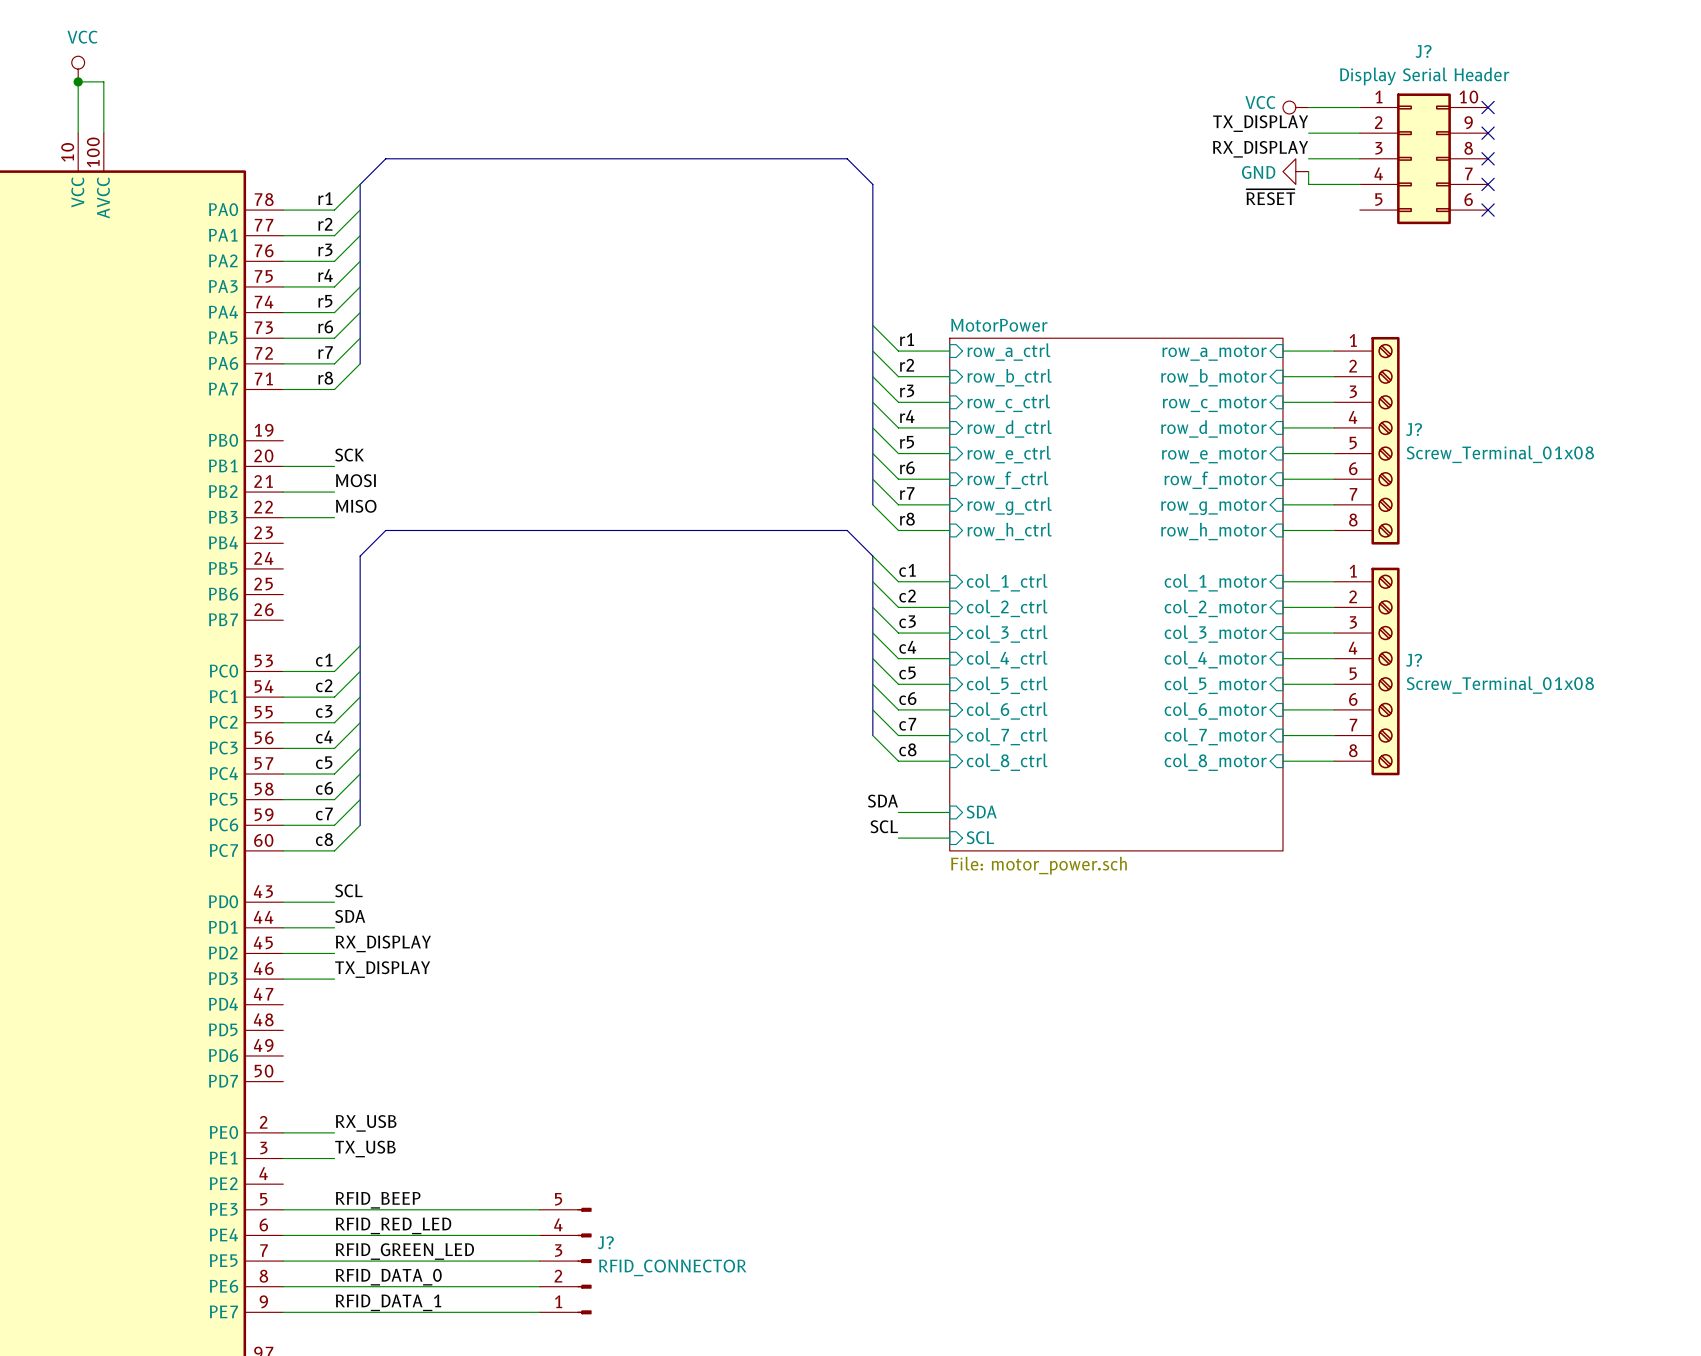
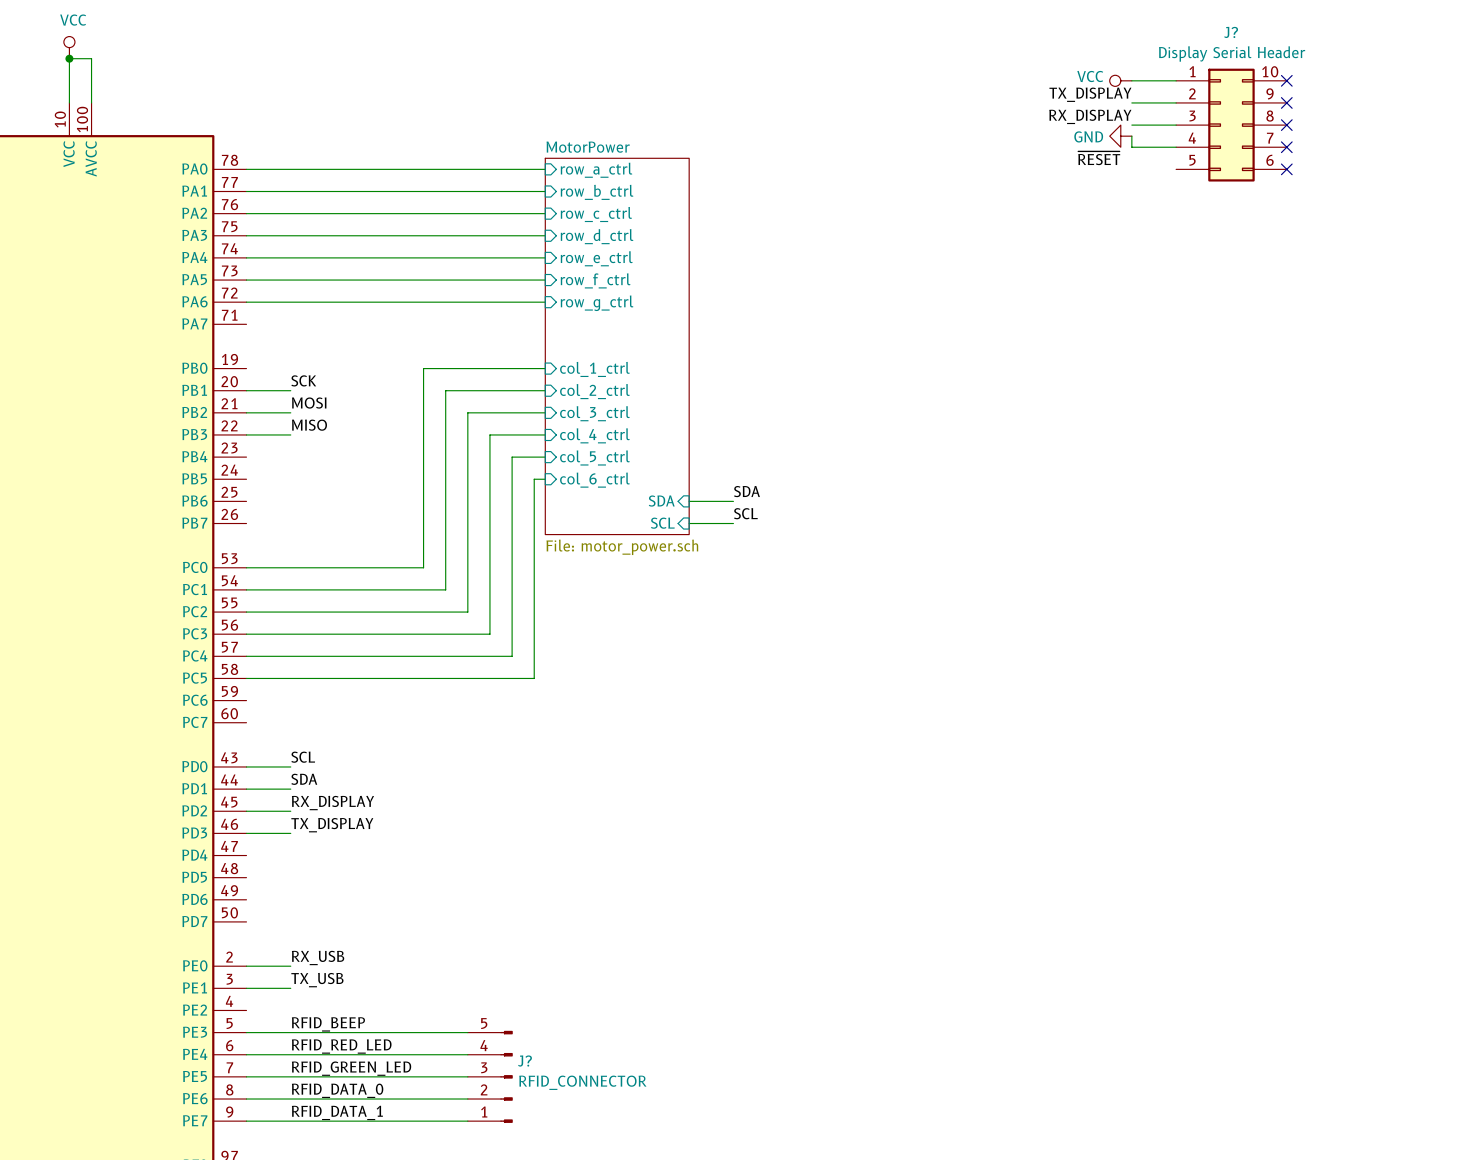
wire: (360, 184) (334, 210) -> (545, 169) (290, 169)
label: r1 (325, 198) -> none
wire: (360, 210) (334, 235) -> (545, 191) (290, 191)
sheet pin: none -> row_a_ctrl (596, 170)
label: r2 (325, 224) -> none
wire: (360, 235) (334, 261) -> (545, 213) (290, 213)
sheet pin: none -> row_b_ctrl (597, 192)
label: r3 (325, 249) -> none
wire: (360, 261) (334, 286) -> (545, 235) (290, 235)
sheet pin: none -> row_c_ctrl (596, 214)
label: r4 (325, 275) -> none
wire: (360, 286) (334, 312) -> (545, 257) (290, 257)
sheet pin: none -> row_d_ctrl (597, 236)
label: r5 (325, 301) -> none
wire: (360, 312) (334, 338) -> (545, 280) (290, 280)
sheet pin: none -> row_e_ctrl (596, 258)
wire: (872, 325) (898, 351) (949, 351) -> none
label: r6 (325, 326) -> none
wire: (360, 338) (334, 363) -> (545, 302) (290, 302)
sheet pin: none -> row_f_ctrl (595, 280)
label: r1 (907, 339) -> none
wire: (872, 351) (898, 376) (949, 376) -> none
wire: (1282, 351) (1334, 351) -> none
label: r7 (325, 352) -> none
sheet pin: row_a_ctrl (1009, 352) -> none
sheet pin: row_a_motor (1214, 352) -> none
wire: (360, 363) (334, 389) (283, 389) -> none
bus: (360, 363) (360, 184) (385, 158) (847, 158) (872, 184) (872, 504) -> none
sheet pin: none -> row_g_ctrl (597, 303)
label: r2 (907, 365) -> none
wire: (872, 376) (898, 402) (949, 402) -> none
wire: (1282, 376) (1334, 376) -> none
sheet pin: row_b_ctrl (1009, 377) -> none
sheet pin: row_b_motor (1214, 377) -> none
label: r8 (325, 378) -> none
label: r3 (907, 390) -> none
wire: (872, 402) (898, 427) (949, 427) -> none
wire: (1282, 402) (1334, 402) -> none
sheet pin: row_c_ctrl (1008, 403) -> none
sheet pin: row_c_motor (1214, 404) -> none
sheet MotorPower: none -> File: motor_power.sch (617, 346)
label: r4 (907, 416) -> none
wire: (872, 427) (898, 453) (949, 453) -> none
wire: (1282, 427) (1334, 427) -> none
sheet pin: row_d_ctrl (1009, 428) -> none
sheet pin: row_d_motor (1214, 428) -> none
J?: Screw_Terminal_01x08 (1366, 440) -> none
sheet pin: none -> col_1_ctrl (594, 369)
label: r5 (907, 442) -> none
wire: (872, 453) (898, 479) (949, 479) -> none
wire: (1282, 453) (1334, 453) -> none
sheet pin: row_e_ctrl (1009, 454) -> none
sheet pin: row_e_motor (1214, 455) -> none
sheet pin: none -> col_2_ctrl (594, 391)
label: r6 (907, 467) -> none
wire: (872, 479) (898, 504) (949, 504) -> none
wire: (1282, 479) (1334, 479) -> none
sheet pin: row_f_ctrl (1008, 480) -> none
sheet pin: row_f_motor (1215, 480) -> none
sheet pin: none -> col_3_ctrl (594, 413)
label: r7 (907, 493) -> none
wire: (872, 504) (898, 530) (949, 530) -> none
wire: (1282, 504) (1334, 504) -> none
sheet pin: row_g_ctrl (1009, 506) -> none
sheet pin: row_g_motor (1214, 506) -> none
sheet pin: none -> col_4_ctrl (594, 435)
label: r8 (907, 519) -> none
wire: (1282, 530) (1334, 530) -> none
sheet pin: row_h_ctrl (1009, 531) -> none
sheet pin: row_h_motor (1214, 531) -> none
sheet pin: none -> col_5_ctrl (594, 457)
wire: (872, 556) (898, 581) (949, 581) -> none
sheet pin: none -> col_6_ctrl (594, 480)
label: c1 (907, 570) -> none
wire: (872, 581) (898, 607) (949, 607) -> none
wire: (1282, 581) (1334, 581) -> none
sheet pin: col_1_ctrl (1007, 582) -> none
sheet pin: col_1_motor (1215, 582) -> none
sheet pin: none -> SDA (661, 501)
sheet MotorPower: File: motor_power.sch (1116, 594) -> none
label: c2 (907, 596) -> none
wire: (872, 607) (898, 633) (949, 633) -> none
wire: (1282, 607) (1334, 607) -> none
sheet pin: col_2_ctrl (1007, 608) -> none
sheet pin: col_2_motor (1215, 608) -> none
sheet pin: none -> SCL (662, 523)
label: c3 (907, 621) -> none
wire: (872, 633) (898, 658) (949, 658) -> none
wire: (1282, 633) (1334, 633) -> none
sheet pin: col_3_ctrl (1007, 634) -> none
sheet pin: col_3_motor (1215, 634) -> none
wire: (360, 645) (334, 671) -> (545, 368) (423, 368) (423, 567) (290, 567)
label: c4 (907, 647) -> none
wire: (872, 658) (898, 684) (949, 684) -> none
wire: (1282, 658) (1334, 658) -> none
sheet pin: col_4_ctrl (1007, 659) -> none
sheet pin: col_4_motor (1215, 659) -> none
label: c1 (324, 660) -> none
wire: (360, 671) (334, 697) -> (545, 390) (445, 390) (445, 589) (290, 589)
J?: Screw_Terminal_01x08 (1366, 671) -> none
label: c5 (907, 673) -> none
wire: (872, 684) (898, 709) (949, 709) -> none
wire: (1282, 684) (1334, 684) -> none
label: c2 (324, 685) -> none
sheet pin: col_5_ctrl (1007, 685) -> none
sheet pin: col_5_motor (1215, 685) -> none
wire: (360, 697) (334, 722) -> (545, 412) (467, 412) (467, 612) (290, 612)
label: c6 (907, 698) -> none
wire: (872, 709) (898, 735) (949, 735) -> none
wire: (1282, 709) (1334, 709) -> none
sheet pin: col_6_ctrl (1007, 710) -> none
sheet pin: col_6_motor (1215, 710) -> none
label: c3 (324, 711) -> none
wire: (360, 722) (334, 748) -> (545, 434) (489, 434) (489, 634) (290, 634)
label: c7 (907, 724) -> none
wire: (872, 735) (898, 761) (949, 761) -> none
bus: (872, 735) (872, 556) (847, 530) (385, 530) (360, 556) (360, 825) -> none
wire: (1282, 735) (1334, 735) -> none
sheet pin: col_7_ctrl (1007, 736) -> none
sheet pin: col_7_motor (1215, 736) -> none
label: c4 (324, 737) -> none
wire: (360, 748) (334, 774) -> (545, 457) (512, 457) (512, 656) (290, 656)
label: c8 (907, 749) -> none
wire: (1282, 761) (1334, 761) -> none
label: c5 (324, 762) -> none
sheet pin: col_8_ctrl (1007, 762) -> none
sheet pin: col_8_motor (1215, 762) -> none
wire: (360, 774) (334, 799) -> (545, 479) (534, 479) (534, 678) (290, 678)
label: c6 (324, 788) -> none
wire: (360, 799) (334, 825) (283, 825) -> none
label position: SDA (882, 801) -> SDA (746, 491)
wire: (898, 812) (949, 812) -> (689, 501) (733, 501)
sheet pin: SDA (981, 812) -> none
label: c7 (324, 814) -> none
wire: (360, 825) (334, 850) (283, 850) -> none
label position: SCL (884, 826) -> SCL (745, 513)
sheet pin: SCL (980, 837) -> none
wire: (898, 838) (949, 838) -> (689, 523) (733, 523)
label: c8 (324, 839) -> none

